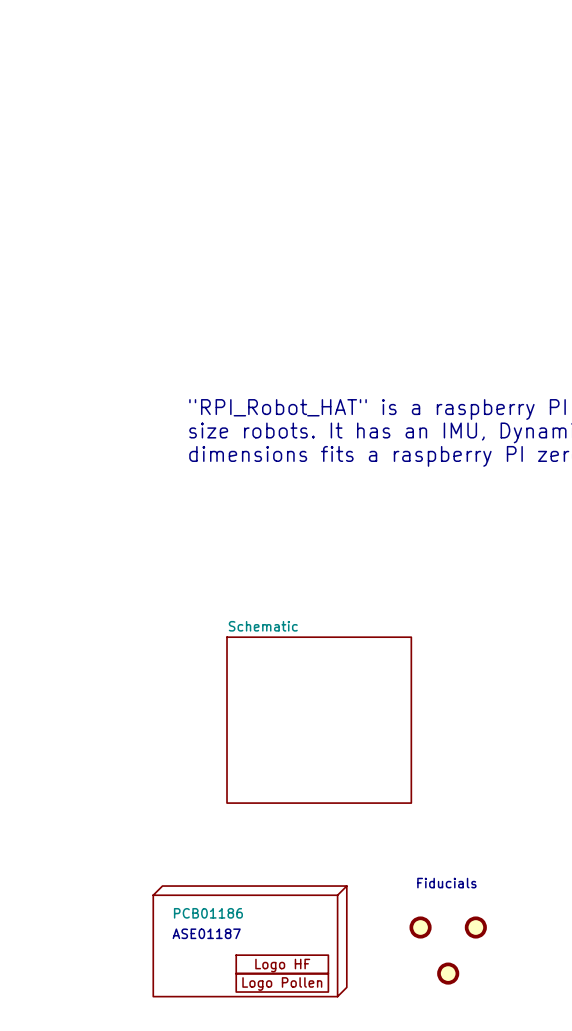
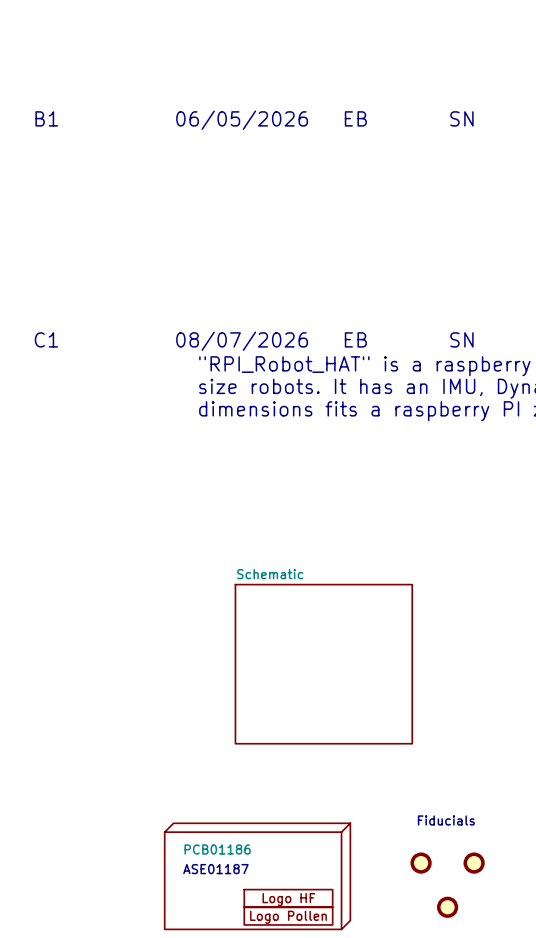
text: none -> B1 (46, 118)
text: none -> EB (355, 118)
text: none -> SN (461, 118)
text: none -> 06/05/2026 (242, 120)
text: none -> C1 (46, 339)
text: none -> EB (355, 339)
text: none -> SN (461, 339)
text: none -> 08/07/2026 (242, 341)

